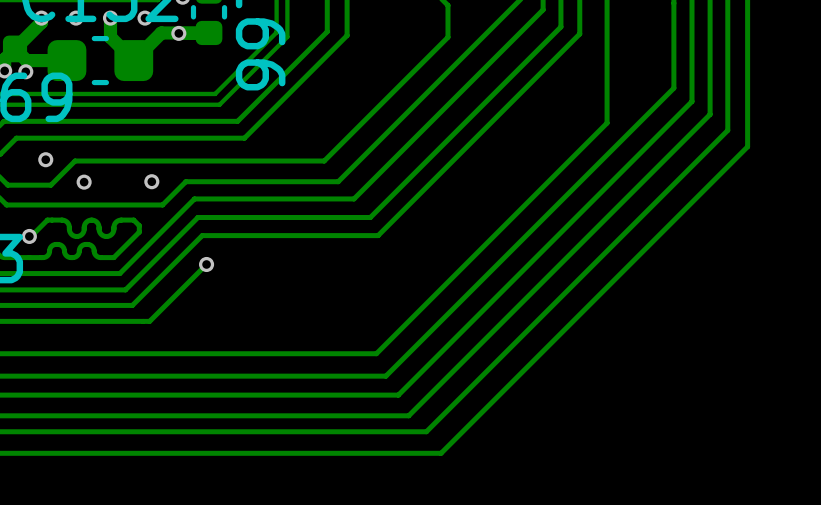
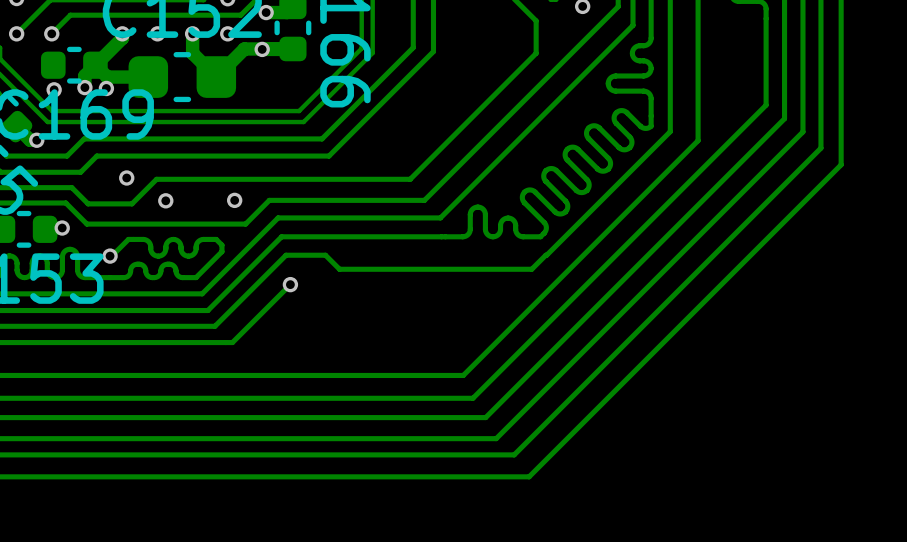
track: (560, 22) (560, 26) (370, 217) -> (651, 38) (648, 44) (636, 46) (632, 53) (636, 59) (649, 63) (651, 68) (648, 73) (644, 75) (613, 76) (609, 78) (608, 83) (609, 88) (613, 90) (644, 91) (648, 93) (651, 97) (651, 126) (643, 128) (625, 111) (616, 112) (614, 116) (614, 121) (631, 141) (629, 147) (624, 149) (619, 148) (598, 126) (593, 125) (588, 127) (586, 132) (587, 137) (609, 159) (610, 165) (606, 170) (600, 170) (576, 148) (571, 147) (567, 149) (565, 153) (566, 158) (588, 182) (588, 188) (582, 192) (576, 190) (555, 169) (550, 168) (545, 170) (543, 175) (544, 180) (567, 203) (567, 208) (563, 213) (555, 212) (533, 190) (524, 192) (522, 196) (523, 201) (545, 224) (545, 230) (540, 236) (519, 235) (516, 232) (514, 221) (508, 218) (501, 221) (498, 234) (490, 236) (485, 231) (484, 211) (477, 207) (470, 211) (468, 233) (464, 236) (457, 236)
track: (579, 33) (378, 235) (241, 235) -> (670, 49) (670, 131) (546, 255)
track: none -> (545, 255) (531, 269) (339, 269) (325, 255)

